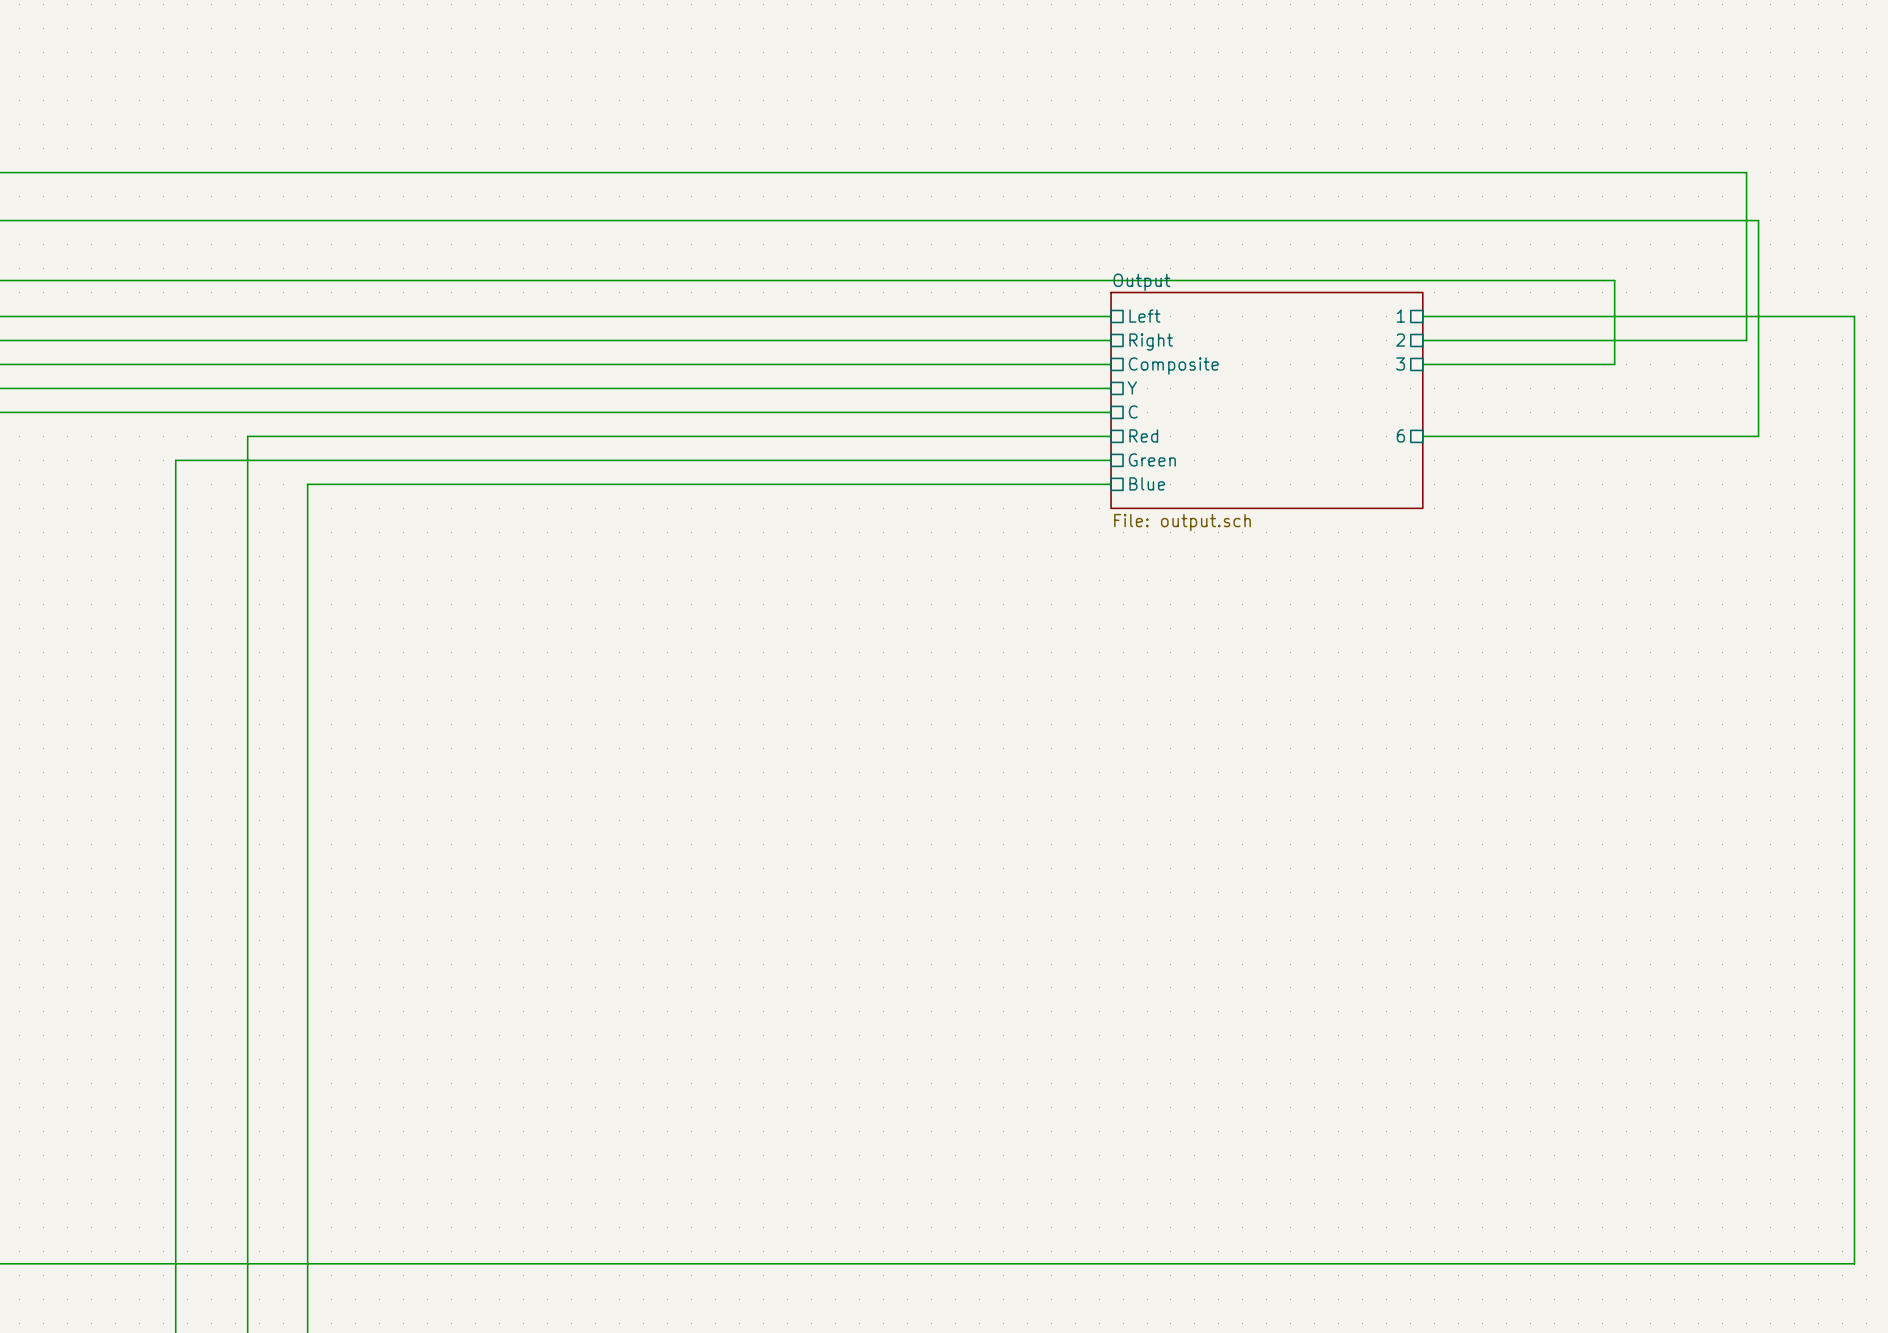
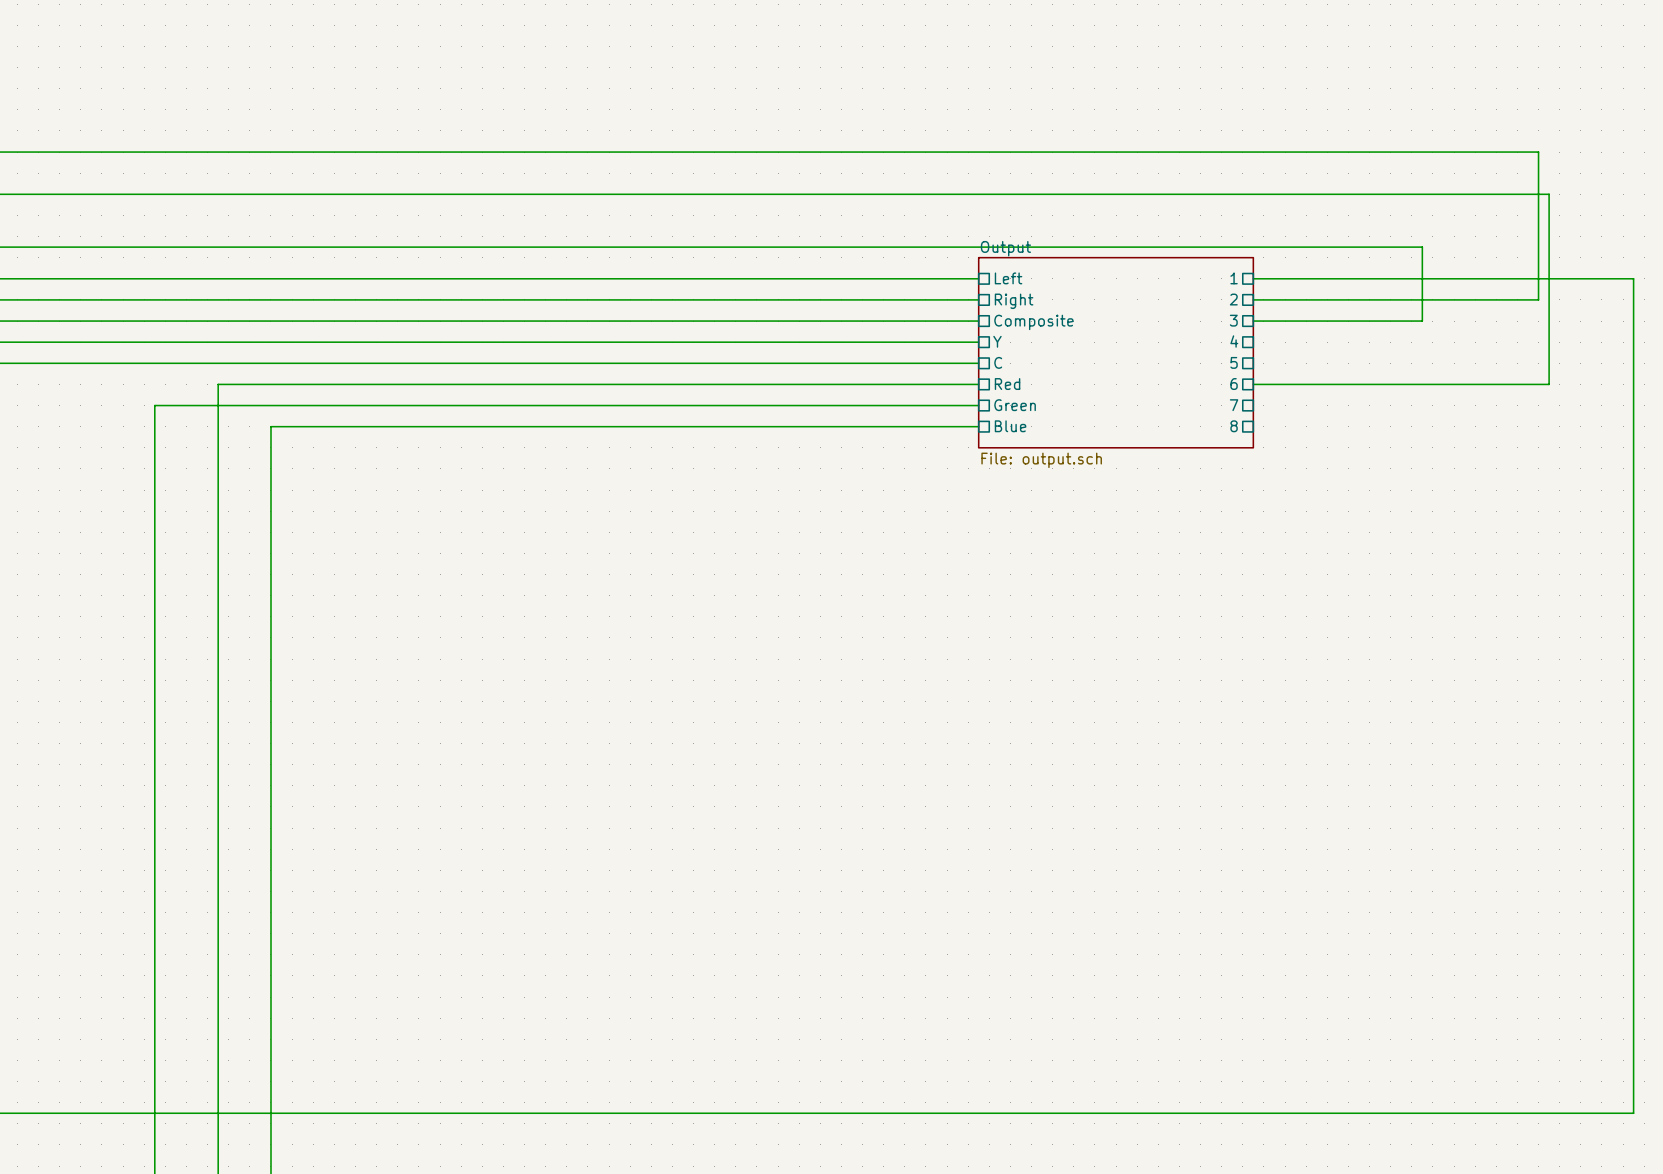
sheet pin: none -> 4 (1234, 341)
sheet pin: none -> 5 (1234, 362)
sheet pin: none -> 7 (1234, 405)
sheet pin: none -> 8 (1234, 426)

